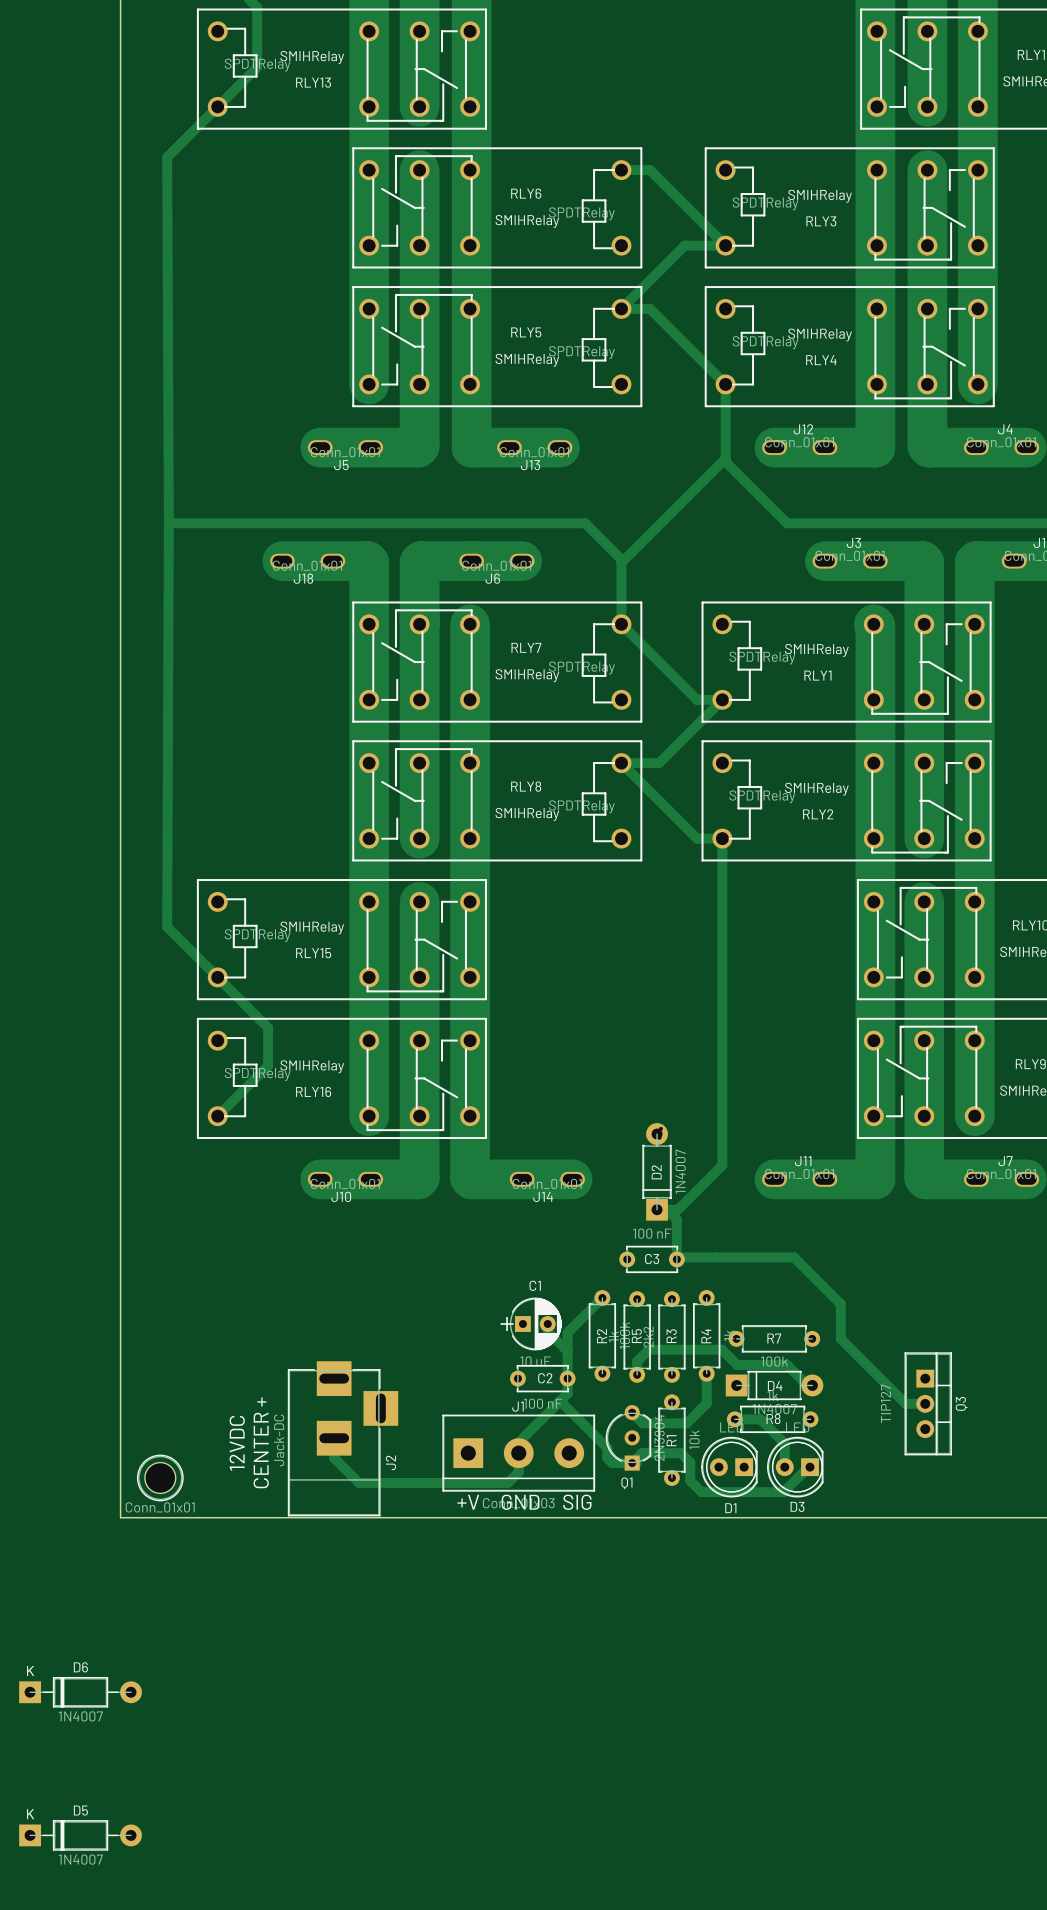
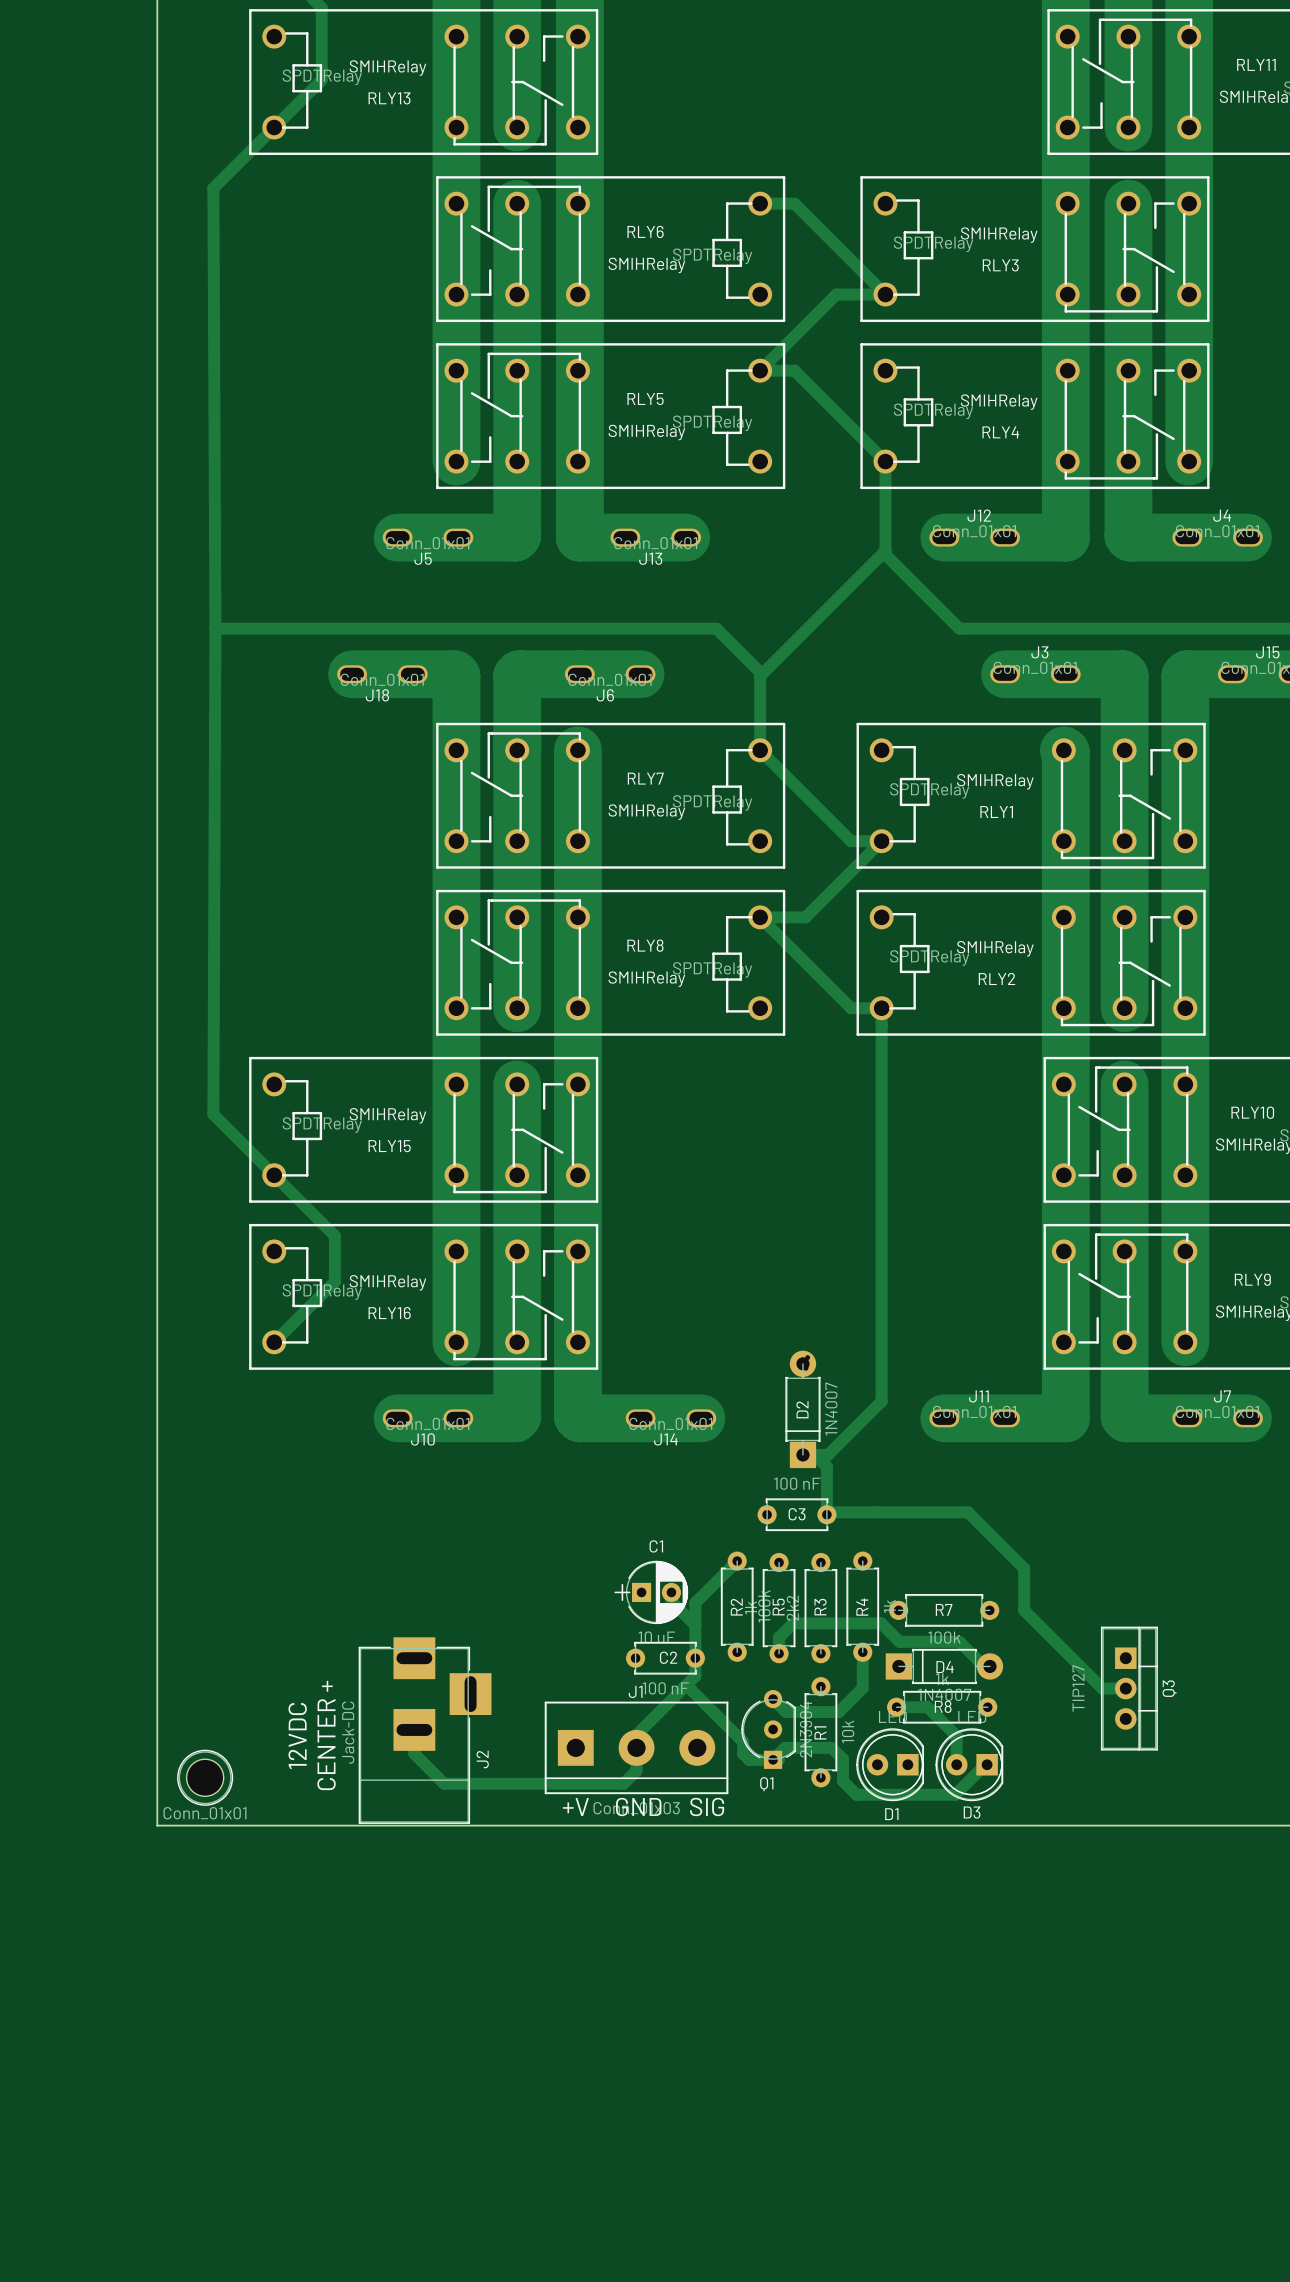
D6: 1N4007 (80, 1692) -> none
D5: 1N4007 (80, 1835) -> none

